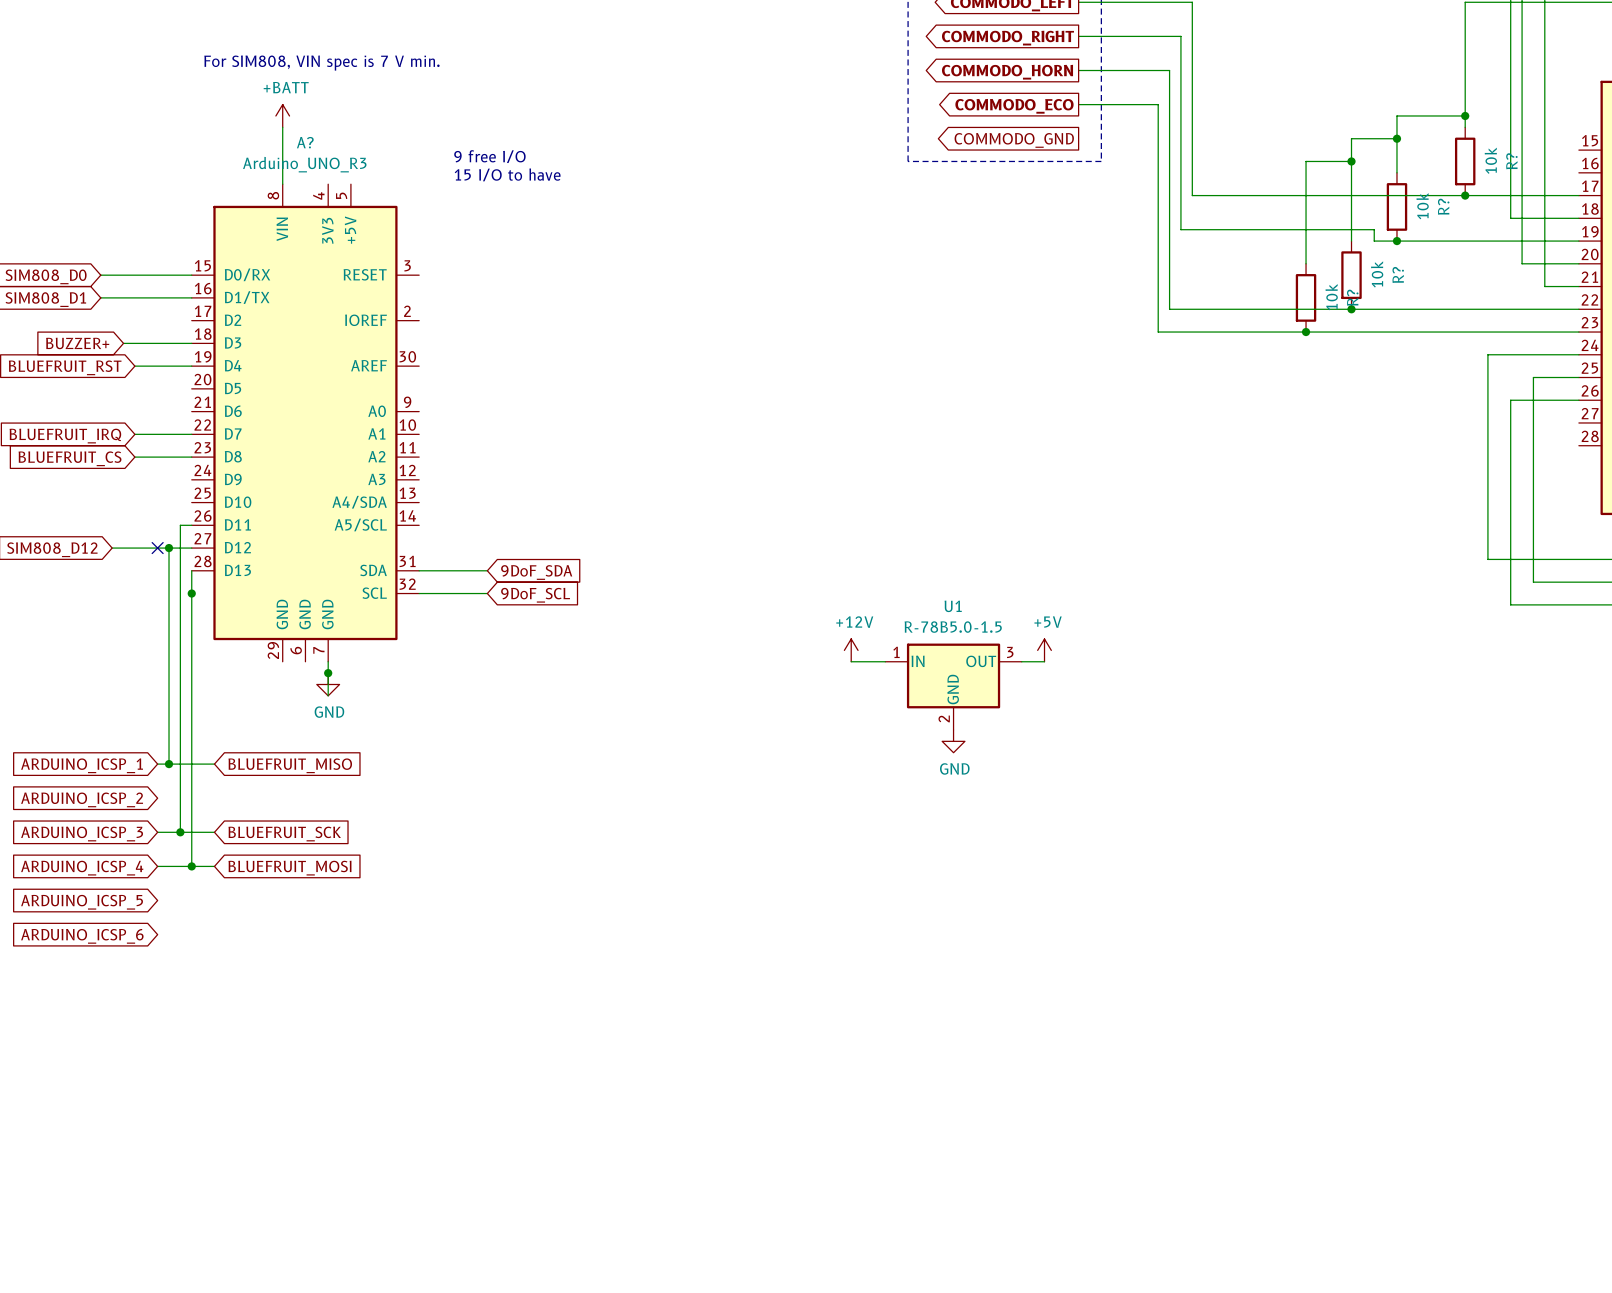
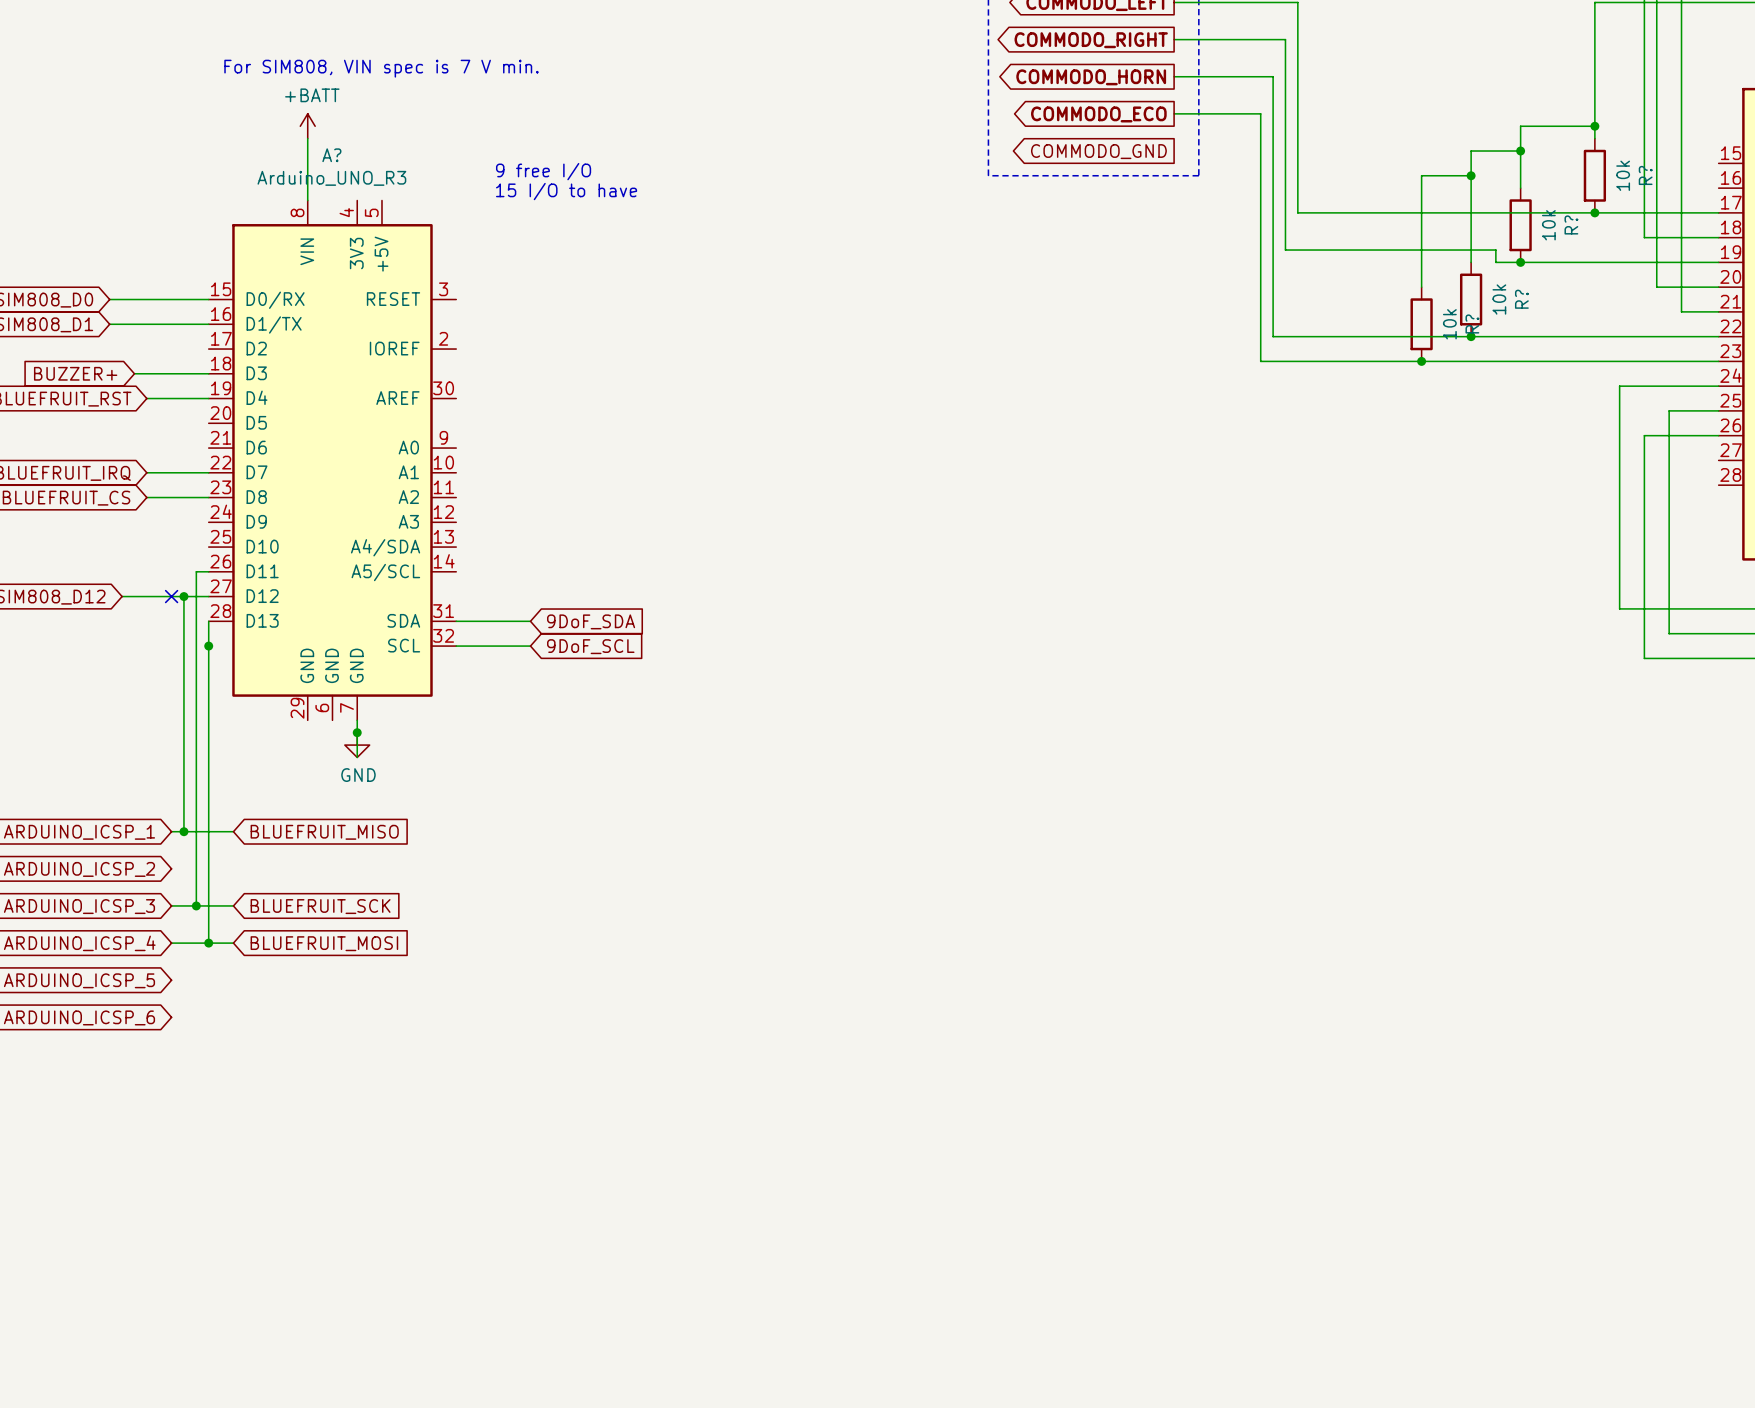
power symbol: +12V (851, 650) -> none
power symbol: +5V (1044, 650) -> none
wire: (851, 661) (885, 661) -> none
wire: (1021, 661) (1044, 661) -> none
U1: R-78B5.0-1.5 (953, 686) -> none
power symbol: GND (953, 741) -> none

